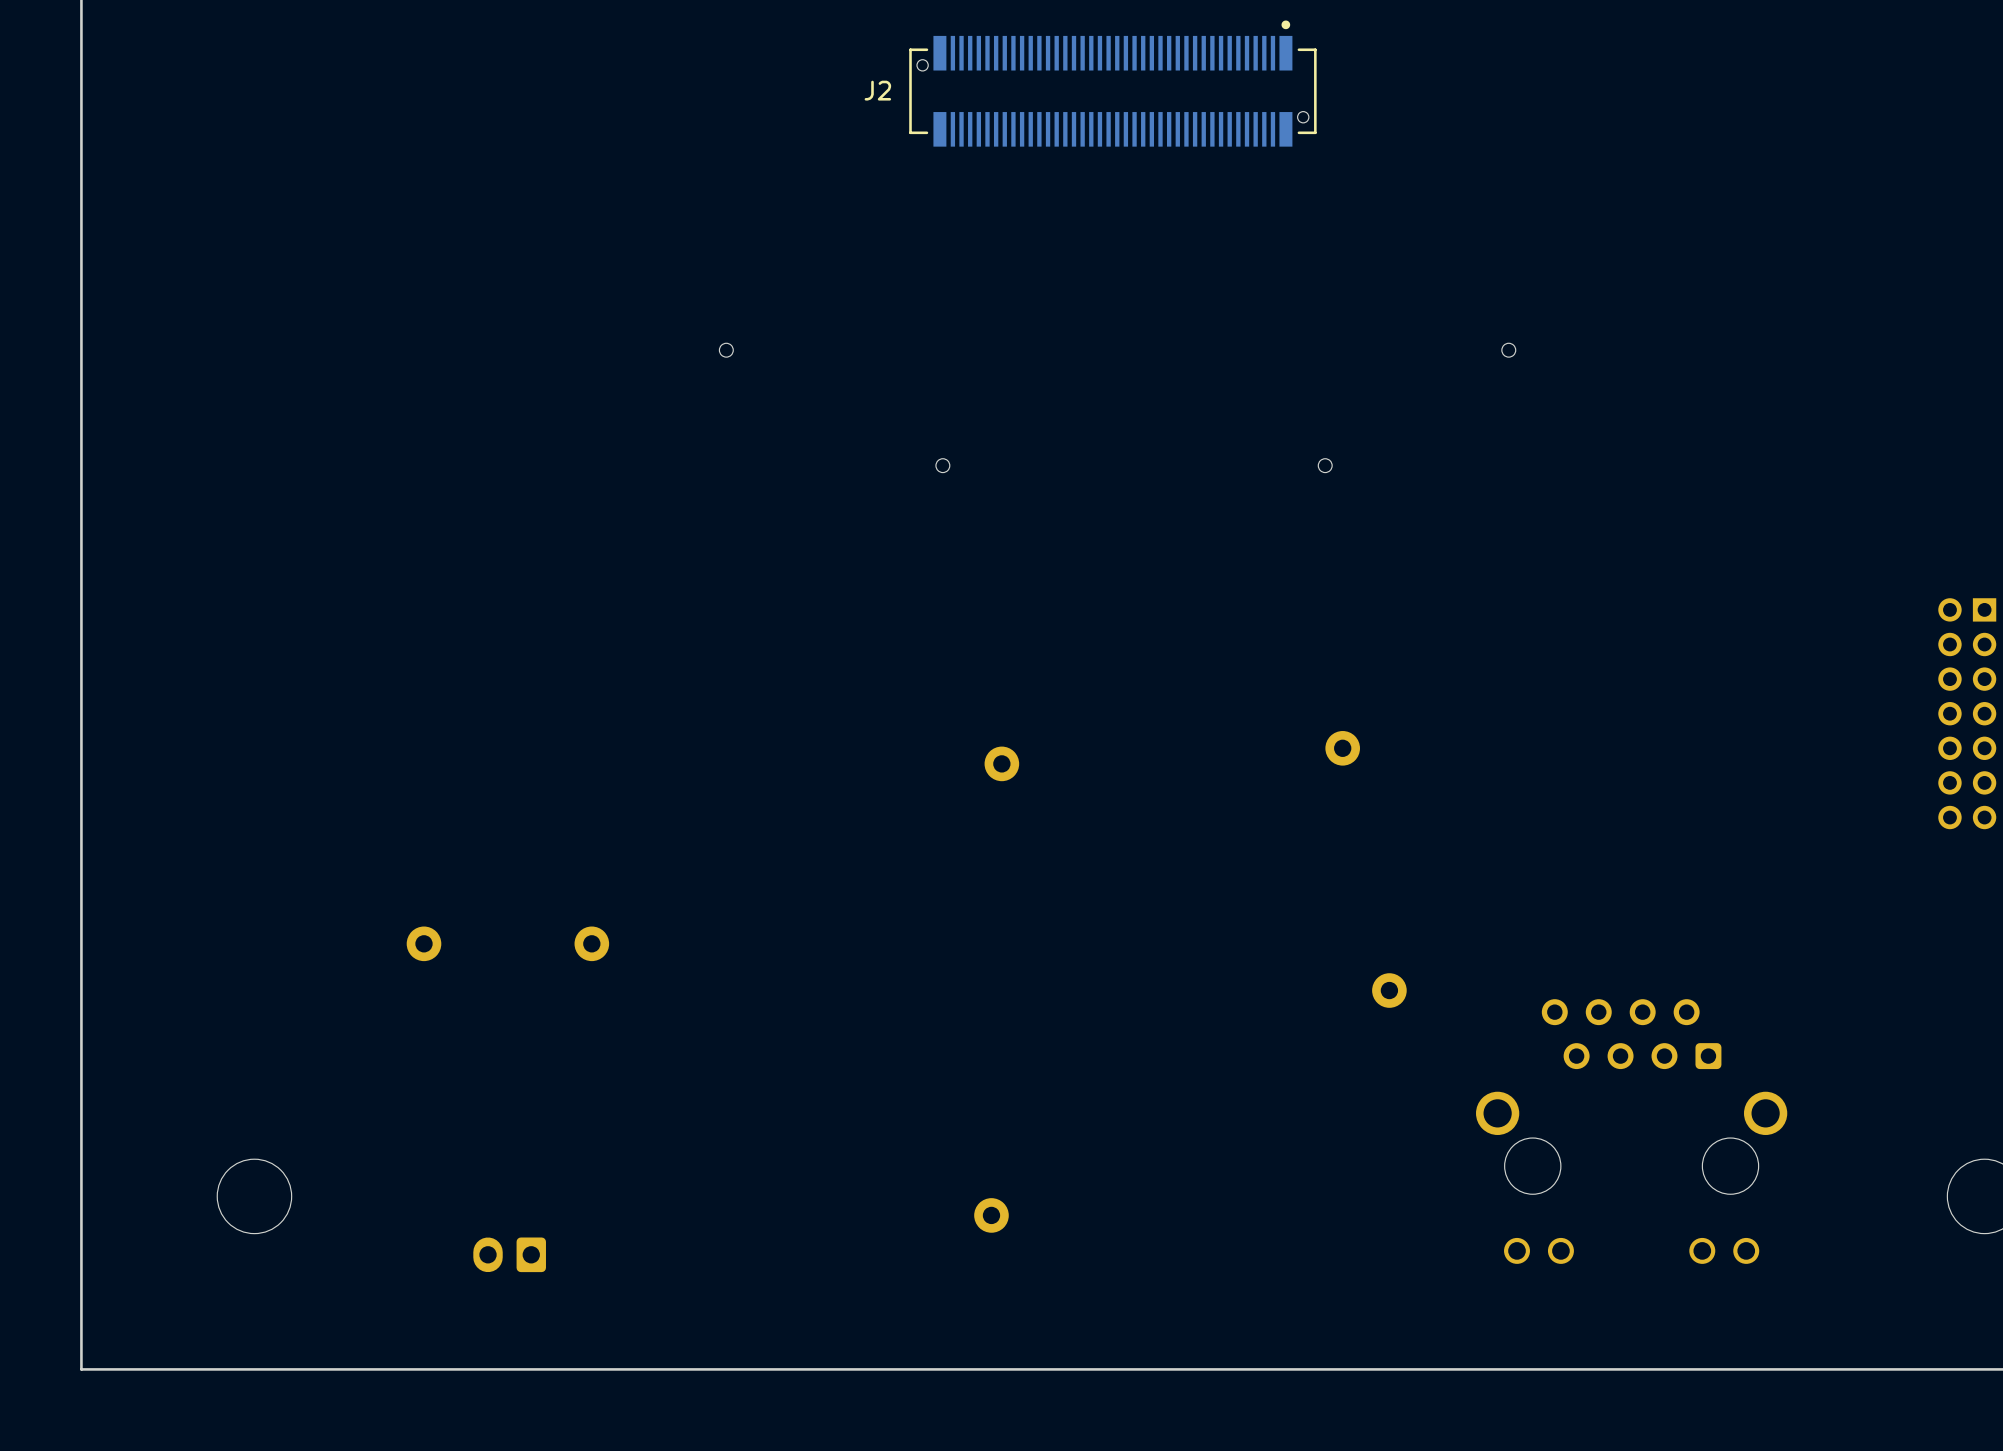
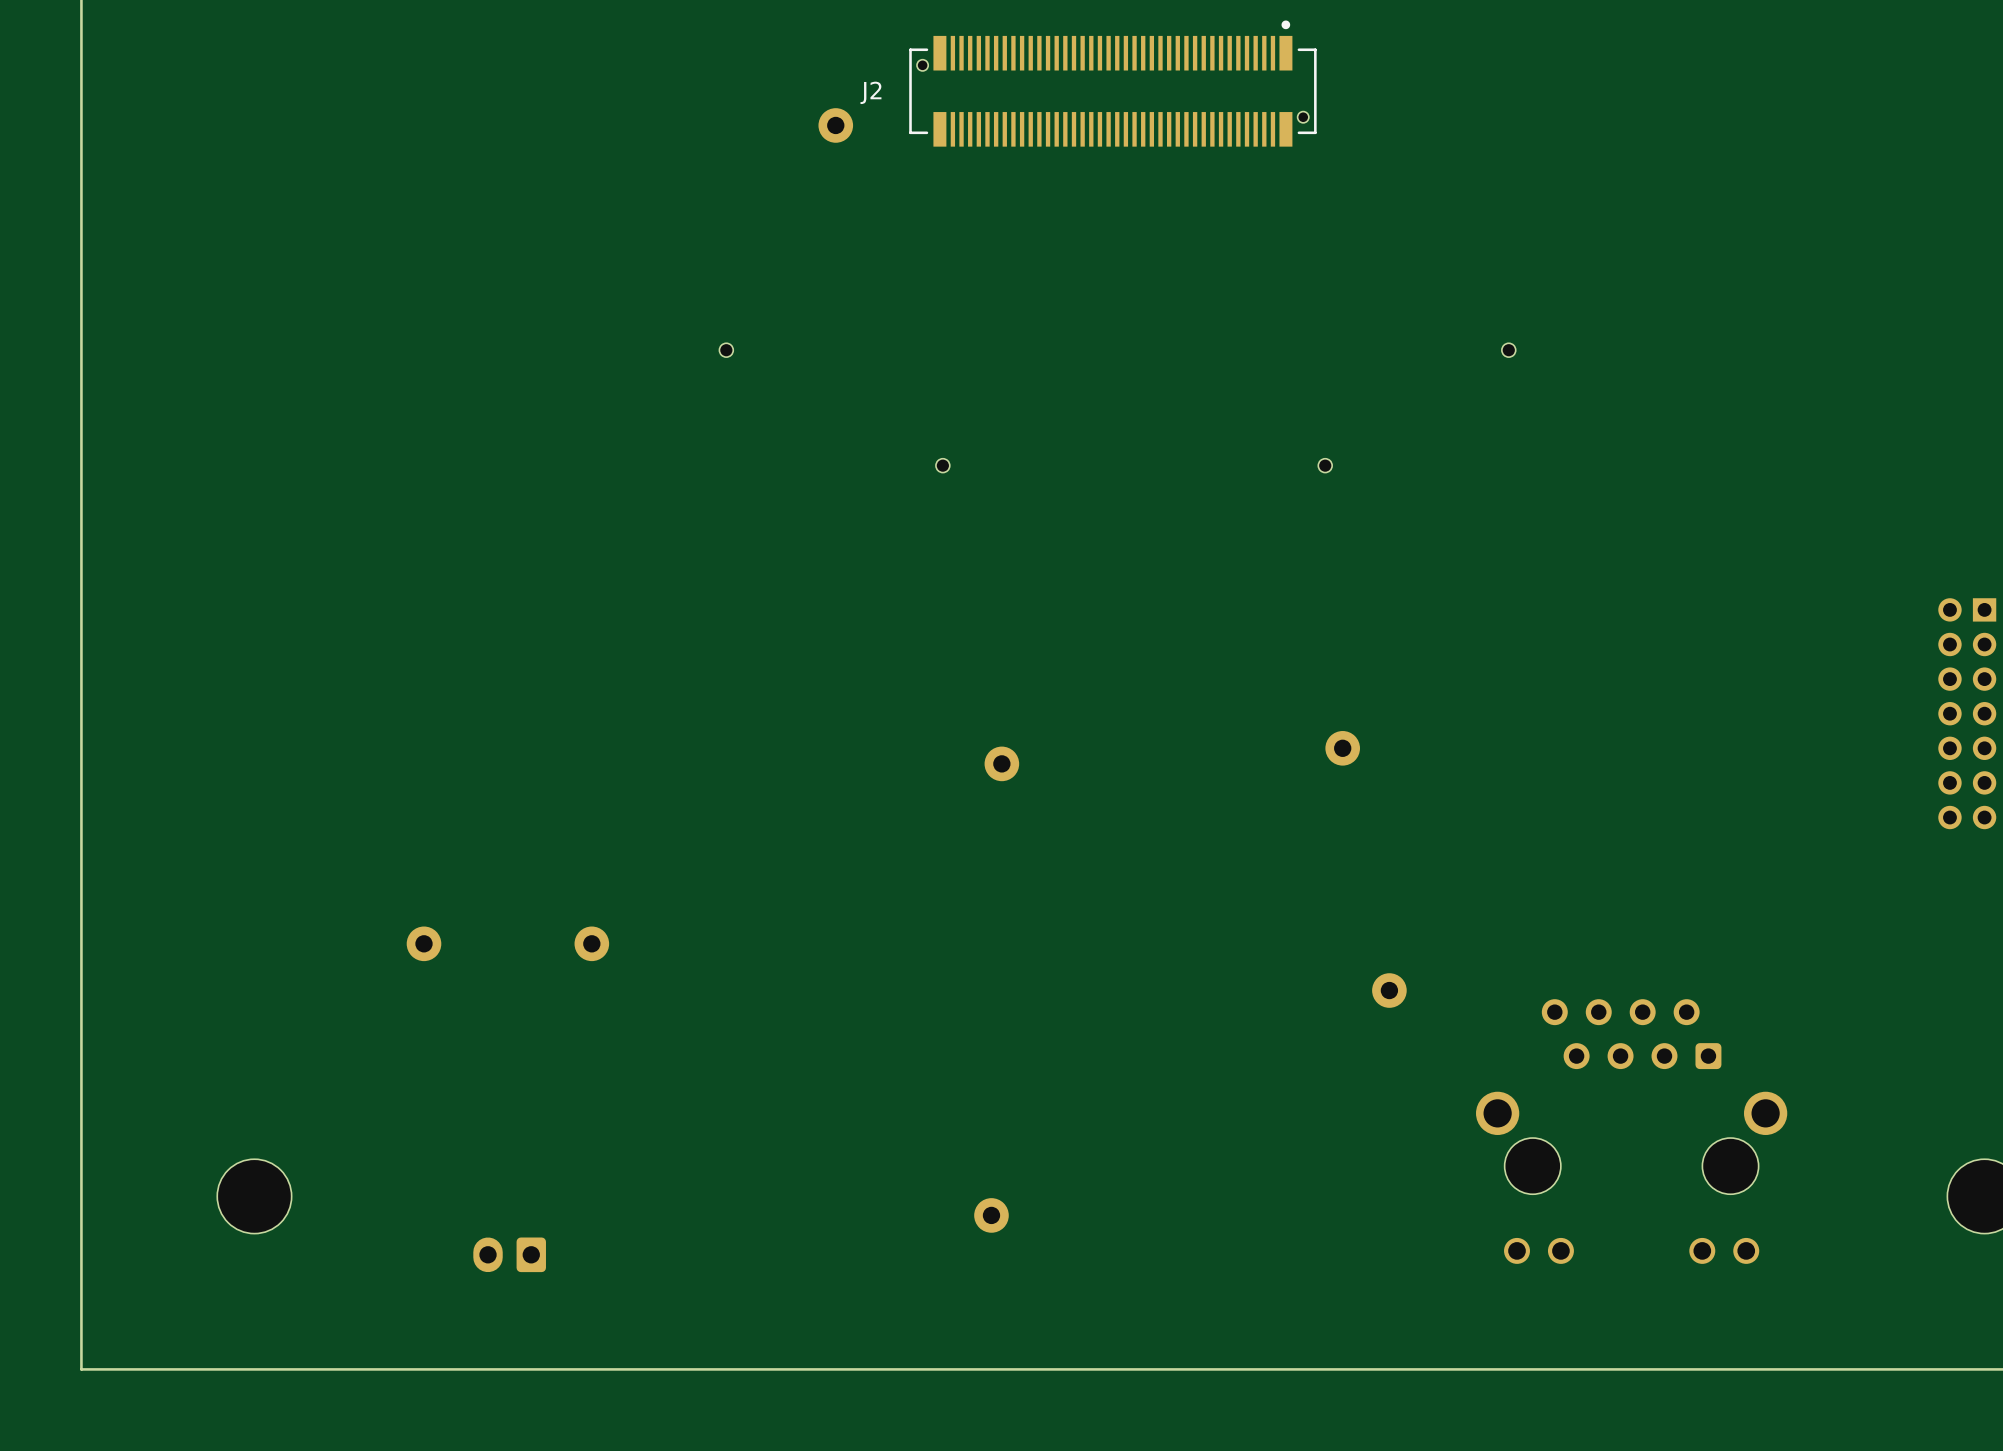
part: none -> (835, 125)

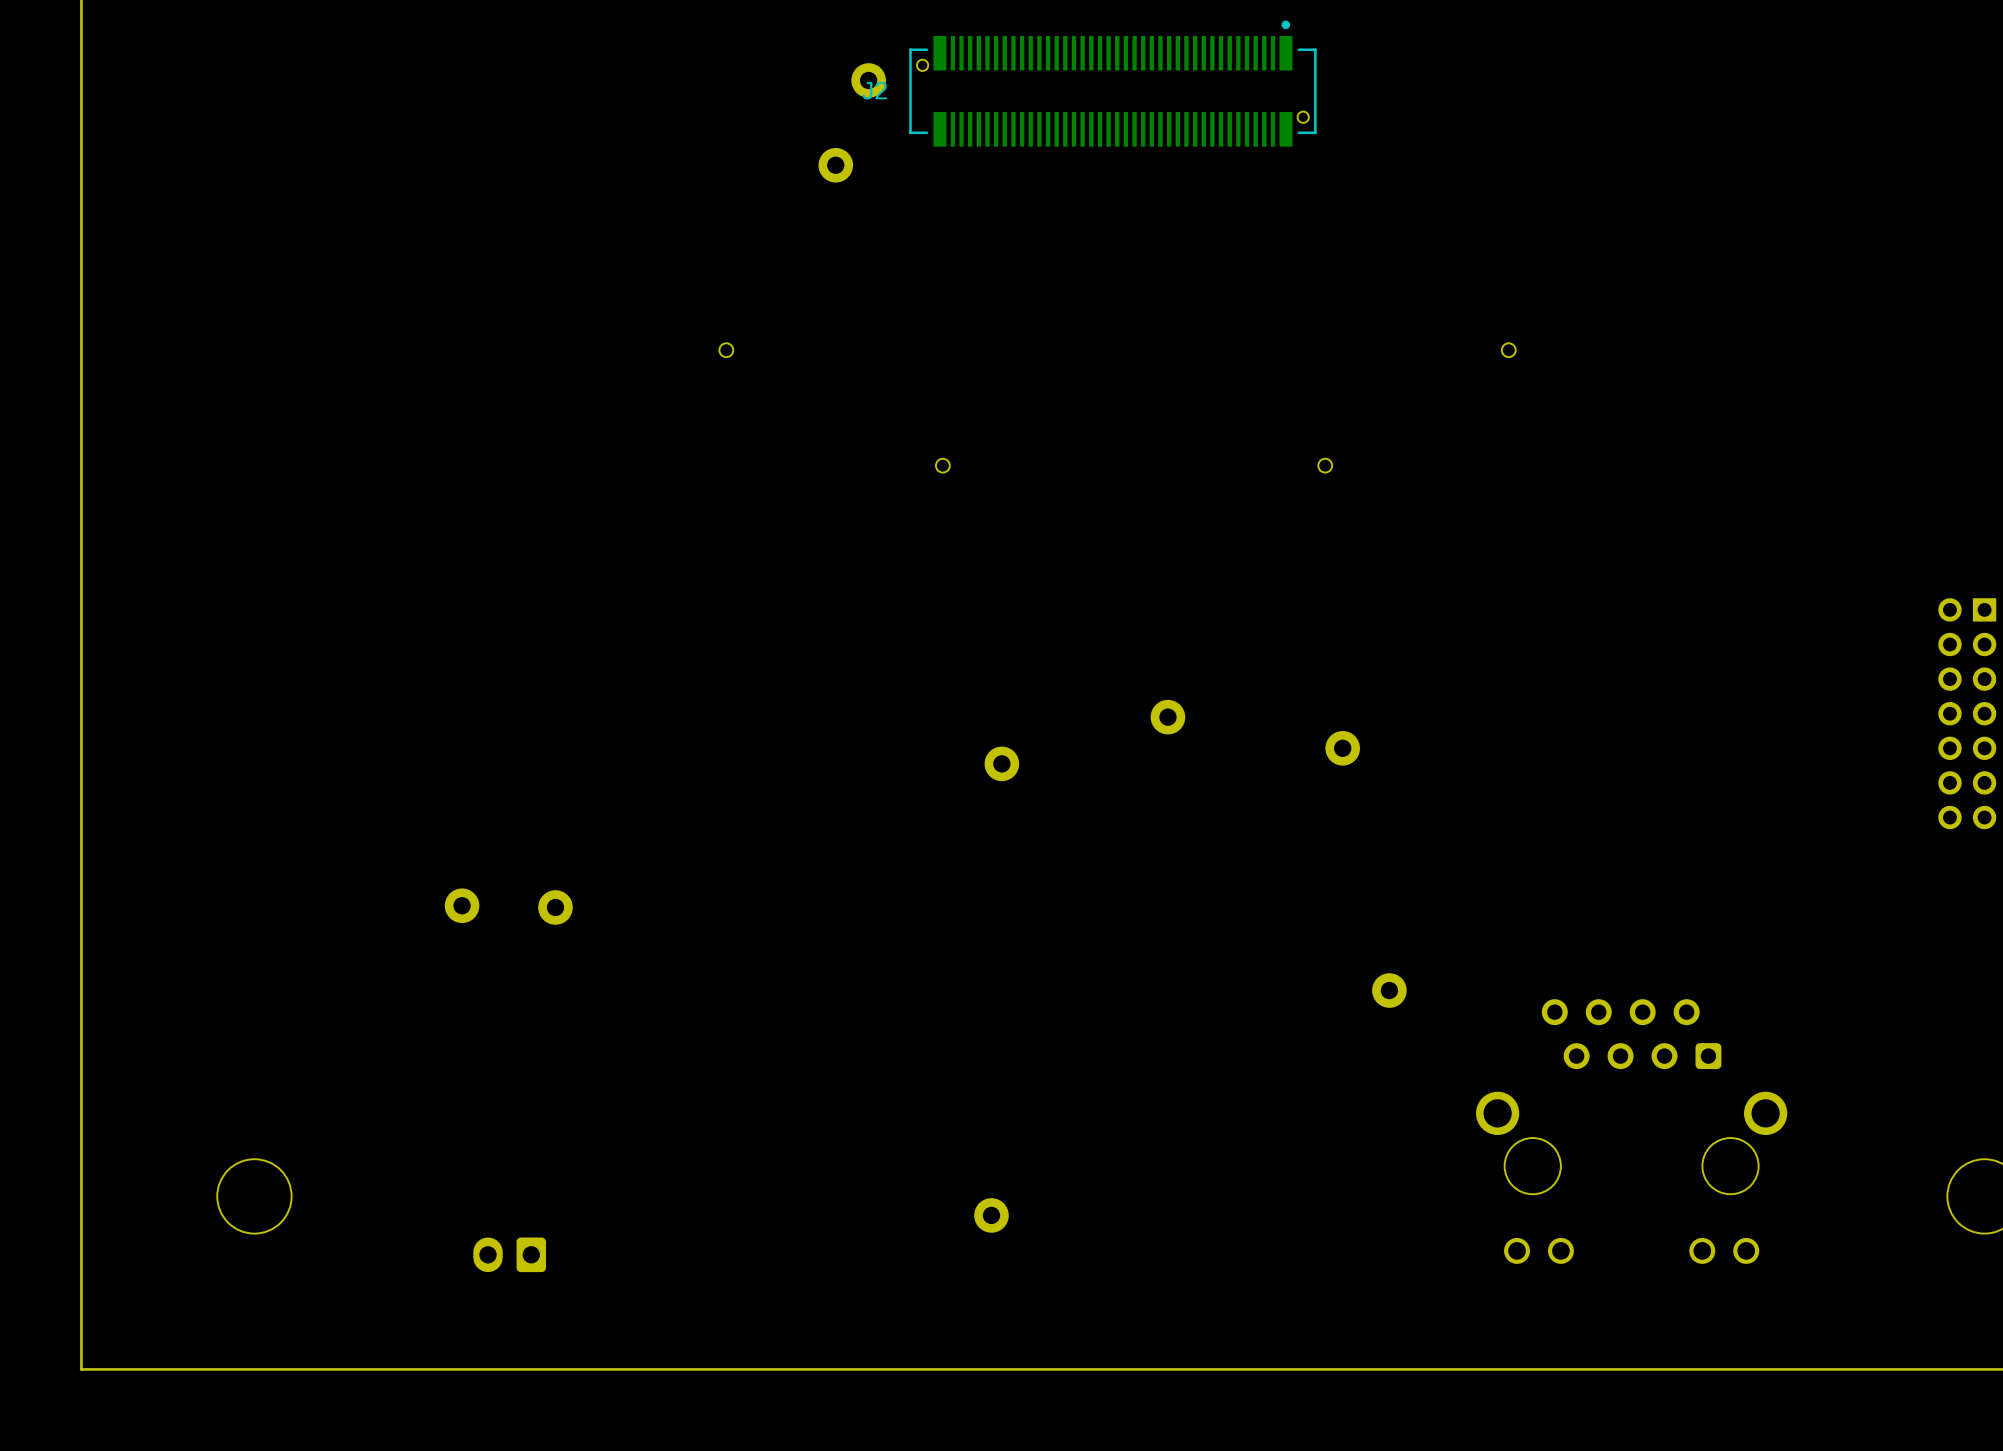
part: none -> (868, 80)
part: (835, 125) -> none
part: none -> (835, 165)
part: none -> (1167, 717)
part position: (424, 943) -> (462, 905)
part position: (591, 943) -> (555, 907)

